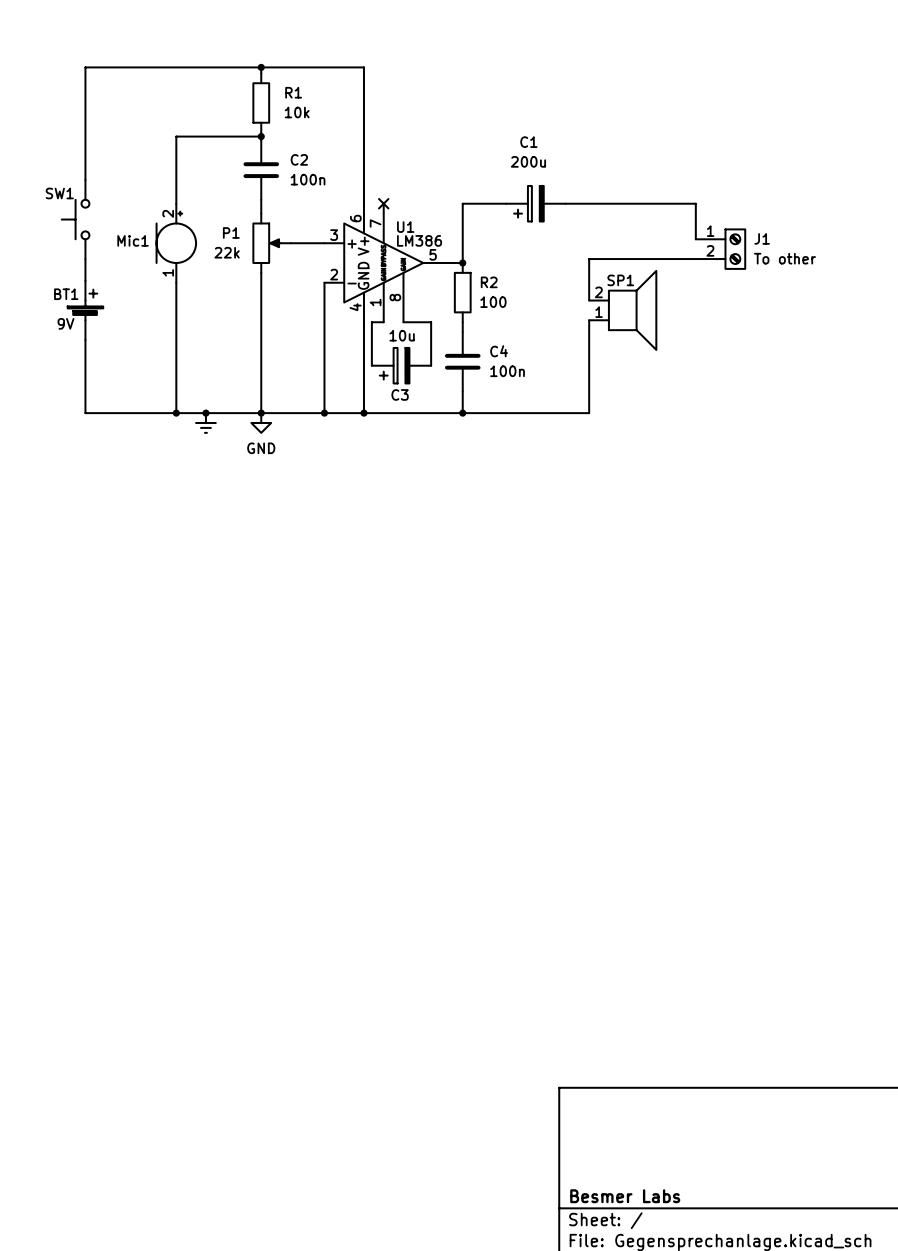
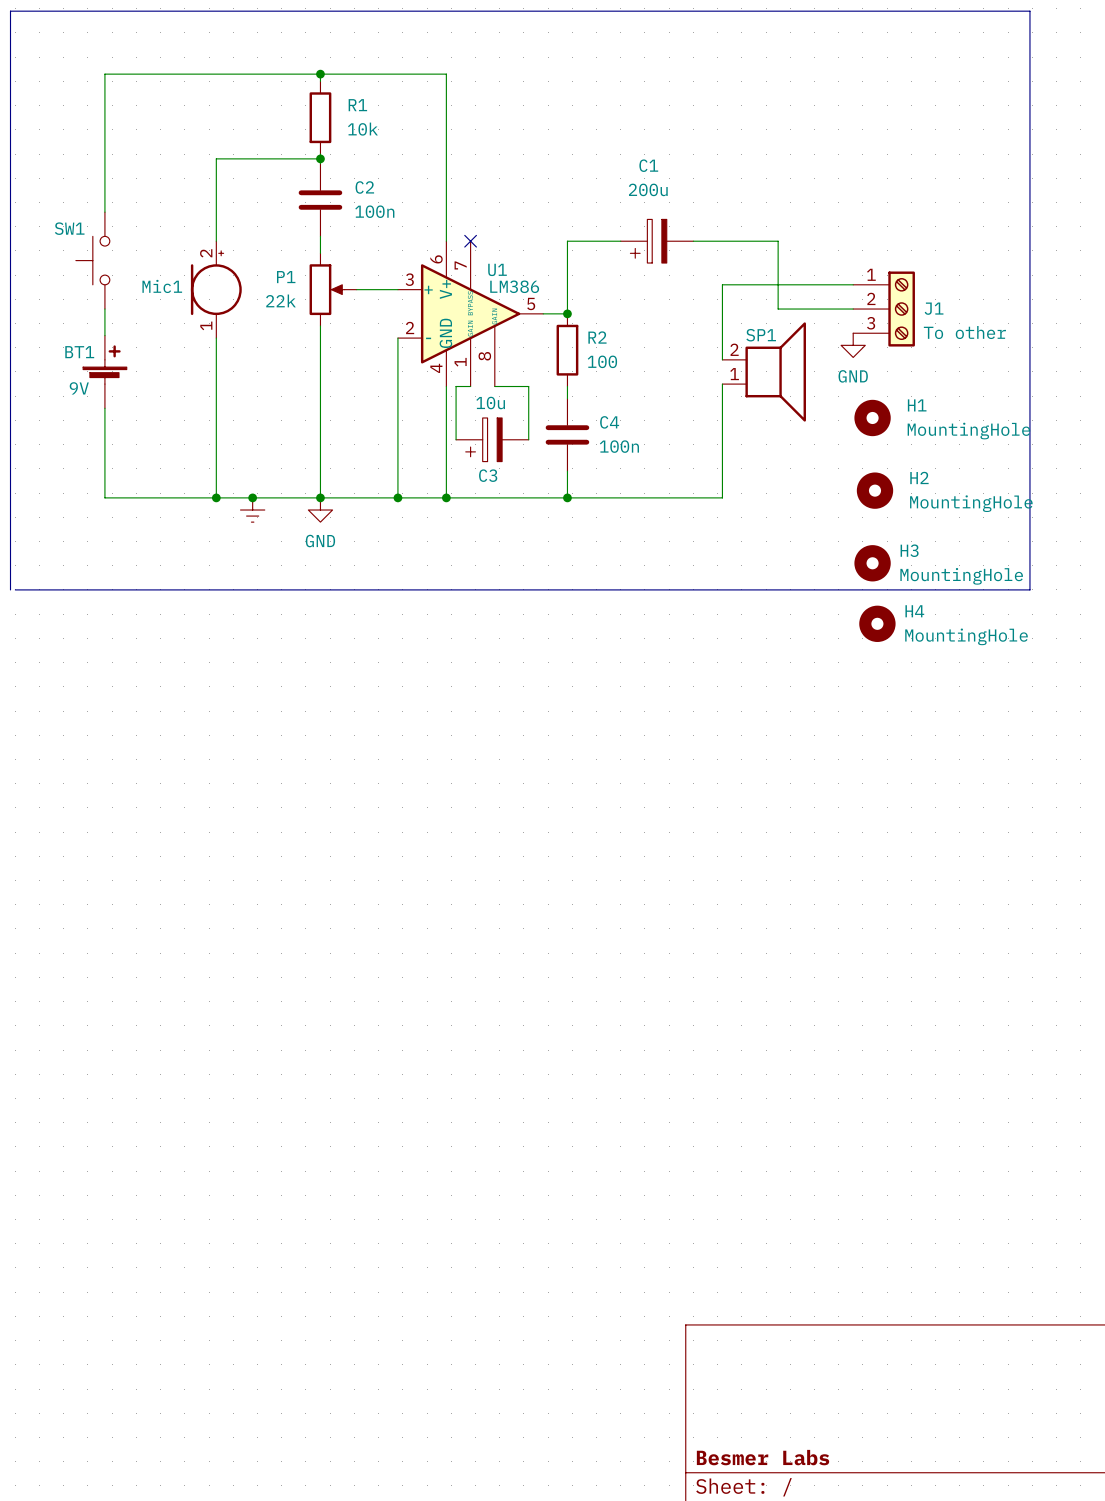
wire: (634, 203) (695, 203) (695, 239) -> (778, 241) (778, 309)
J1 symbol: [695, 228, 747, 270] -> [853, 271, 915, 347]
wire: (589, 259) (634, 259) -> (722, 309) (722, 284) (853, 284)
power symbol: none -> GND (853, 345)
H1: none -> MountingHole (872, 417)
H2: none -> MountingHole (874, 490)
H3: none -> MountingHole (872, 563)
line: none -> (10, 589) (10, 11) (1029, 11) (1029, 589) (15, 589)
H4: none -> MountingHole (877, 623)

